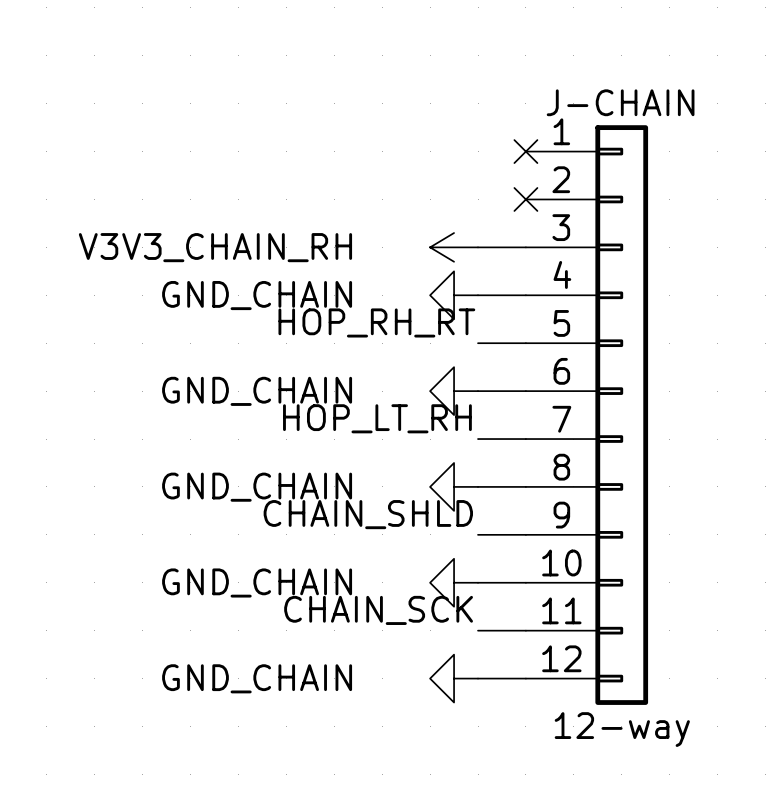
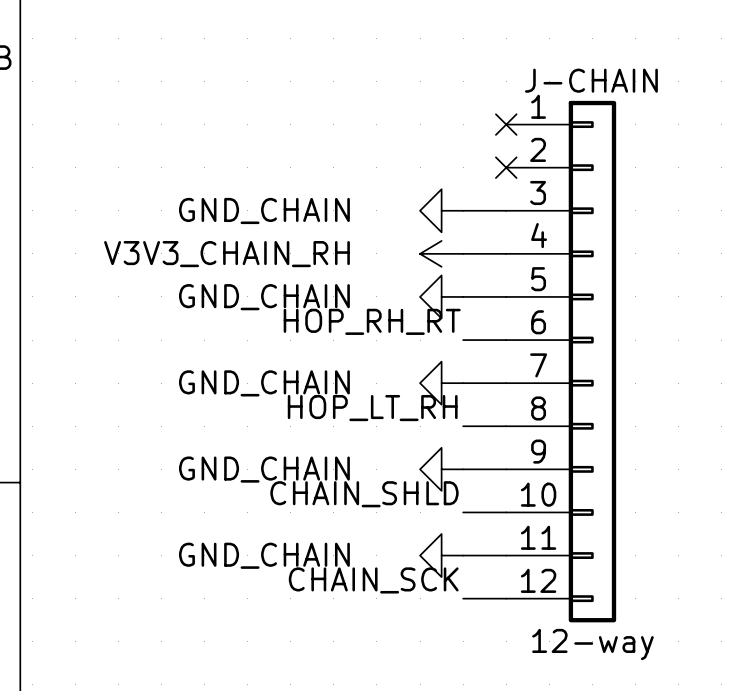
power symbol: V3V3_CHAIN_RH (454, 247) -> GND_CHAIN (441, 210)
power symbol: GND_CHAIN (454, 295) -> V3V3_CHAIN_RH (441, 253)
label position: HOP_RH_RT (376, 322) -> HOP_RH_RT (372, 321)
power symbol: none -> GND_CHAIN (441, 296)
power symbol: GND_CHAIN (454, 391) -> none
label position: HOP_LT_RH (377, 418) -> HOP_LT_RH (372, 408)
power symbol: none -> GND_CHAIN (441, 383)
power symbol: GND_CHAIN (454, 486) -> none
label position: CHAIN_SHLD (368, 514) -> CHAIN_SHLD (364, 494)
power symbol: none -> GND_CHAIN (441, 469)
power symbol: GND_CHAIN (454, 582) -> none
label position: CHAIN_SCK (378, 610) -> CHAIN_SCK (373, 580)
power symbol: none -> GND_CHAIN (441, 555)
power symbol: GND_CHAIN (454, 678) -> none

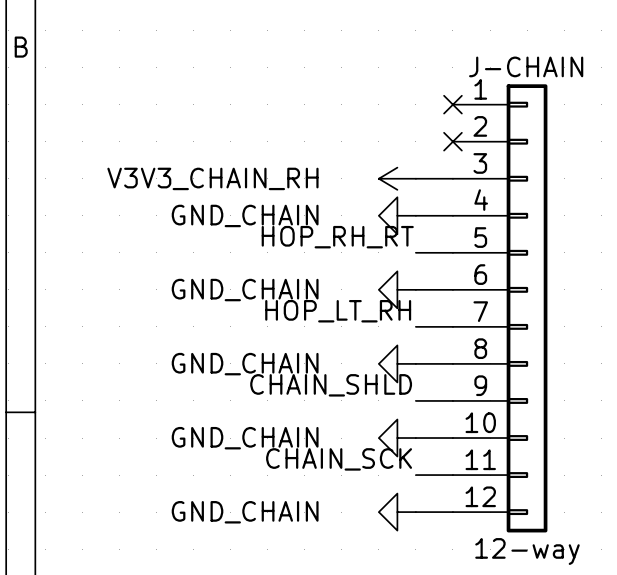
power symbol: GND_CHAIN (441, 210) -> V3V3_CHAIN_RH (397, 178)
power symbol: V3V3_CHAIN_RH (441, 253) -> GND_CHAIN (397, 215)
power symbol: GND_CHAIN (441, 296) -> none
label position: HOP_RH_RT (372, 321) -> HOP_RH_RT (337, 237)
power symbol: none -> GND_CHAIN (397, 289)
power symbol: GND_CHAIN (441, 383) -> none
label position: HOP_LT_RH (372, 408) -> HOP_LT_RH (338, 311)
power symbol: none -> GND_CHAIN (397, 363)
power symbol: GND_CHAIN (441, 469) -> none
label position: CHAIN_SHLD (364, 494) -> CHAIN_SHLD (331, 385)
power symbol: none -> GND_CHAIN (397, 438)
power symbol: GND_CHAIN (441, 555) -> none
label position: CHAIN_SCK (373, 580) -> CHAIN_SCK (339, 459)
power symbol: none -> GND_CHAIN (397, 512)

